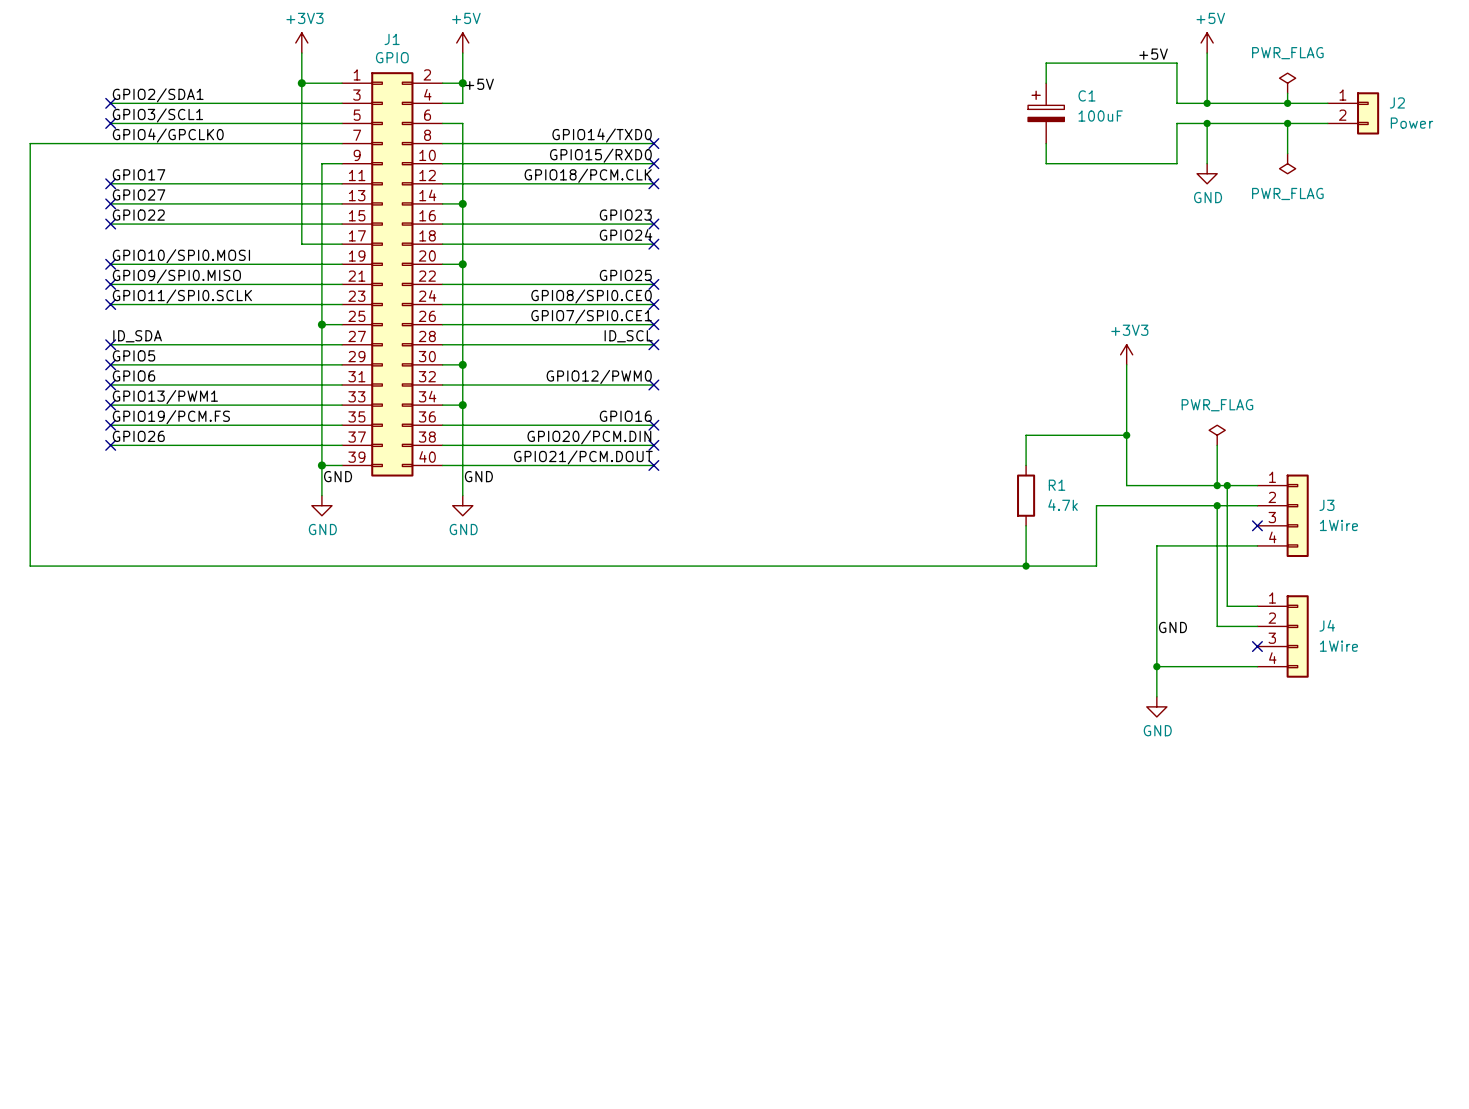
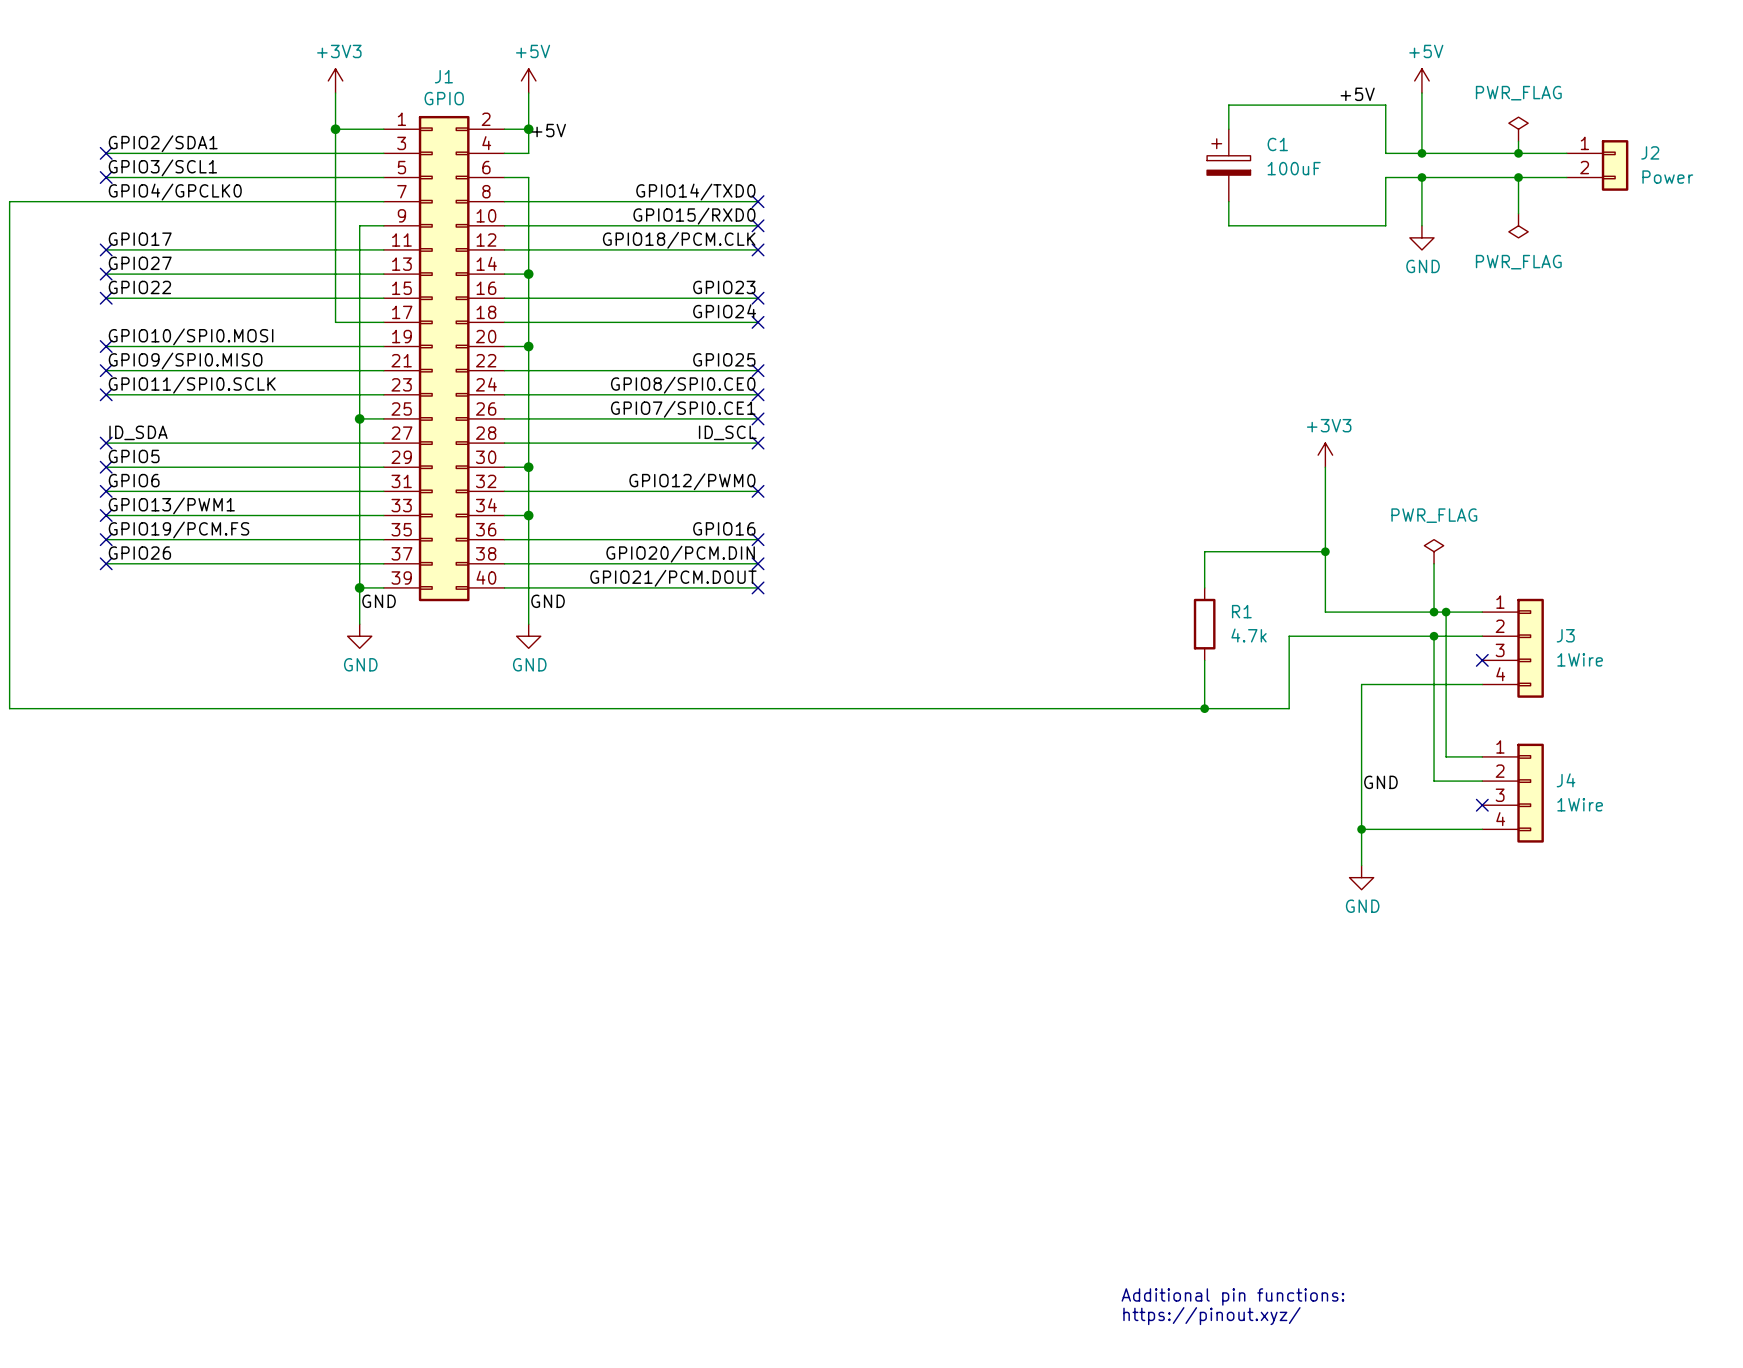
text: none -> Additional pin functions: (1232, 1296)
text: none -> https://pinout.xyz/ (1211, 1316)

